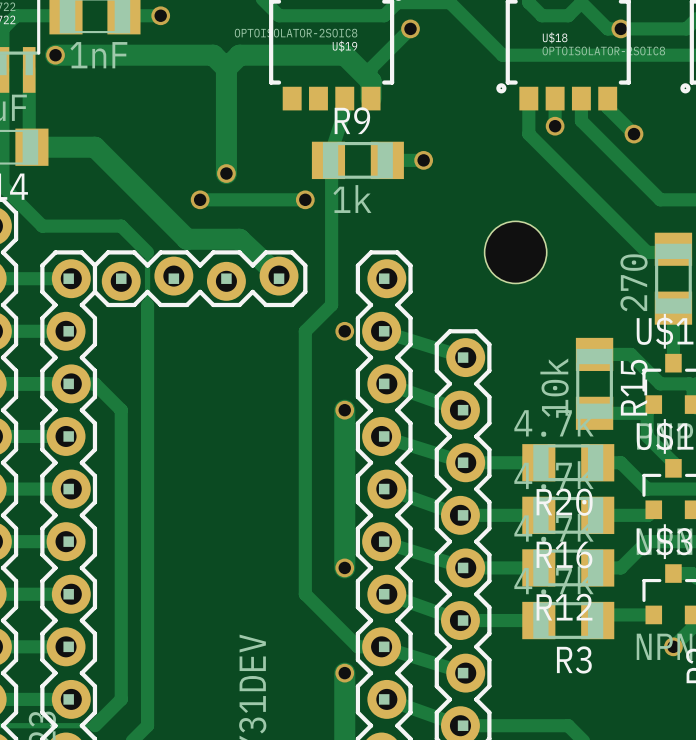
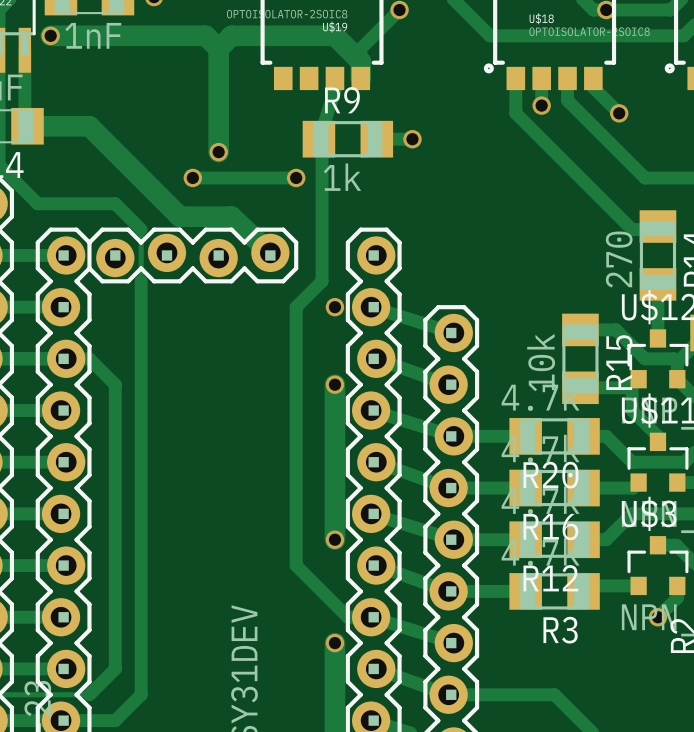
hole: (515, 252) -> none

